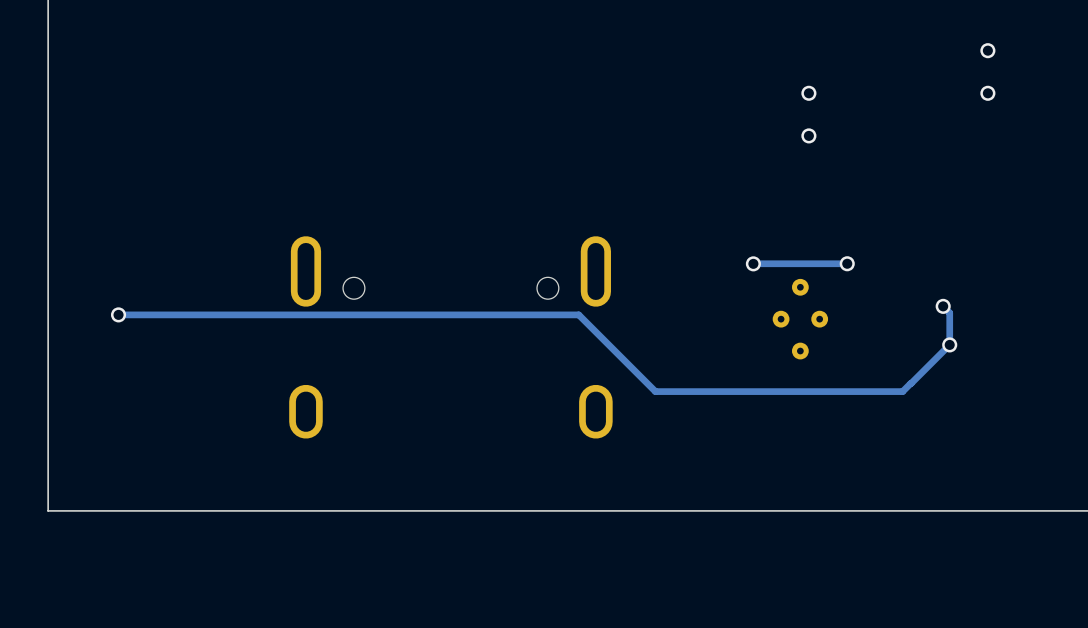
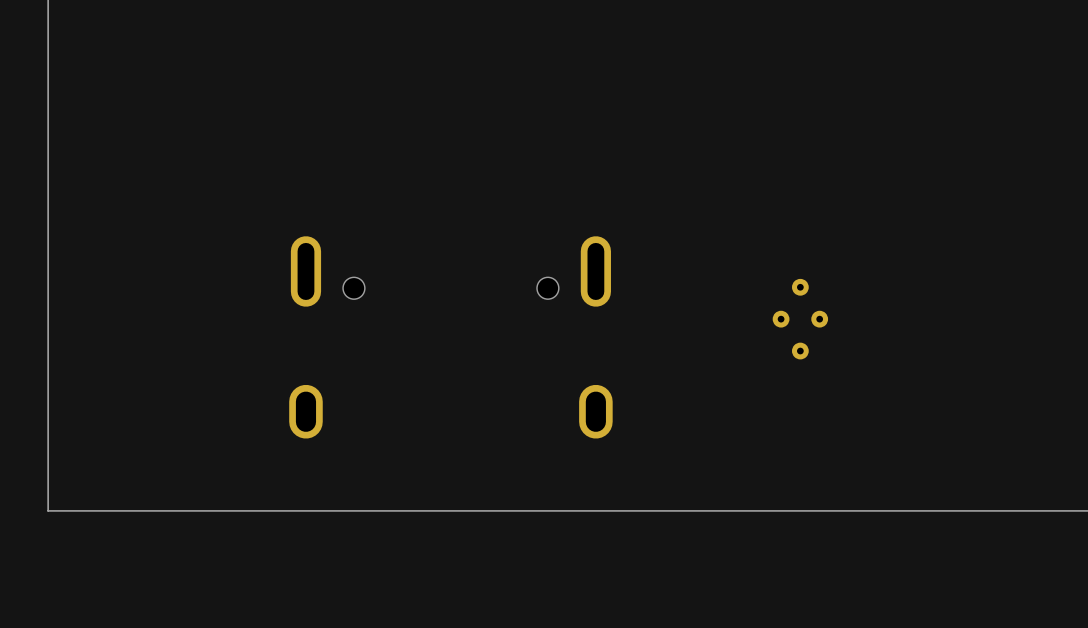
via: (987, 50) -> none
via: (808, 93) -> none
via: (987, 93) -> none
via: (808, 135) -> none
via: (753, 263) -> none
track: (847, 263) (753, 263) -> none
via: (847, 263) -> none
track: (943, 306) (949, 312) (949, 344) (911, 383) -> none
via: (943, 306) -> none
track: (118, 314) (578, 314) (655, 391) (902, 391) (910, 383) -> none
via: (118, 314) -> none
via: (949, 344) -> none

